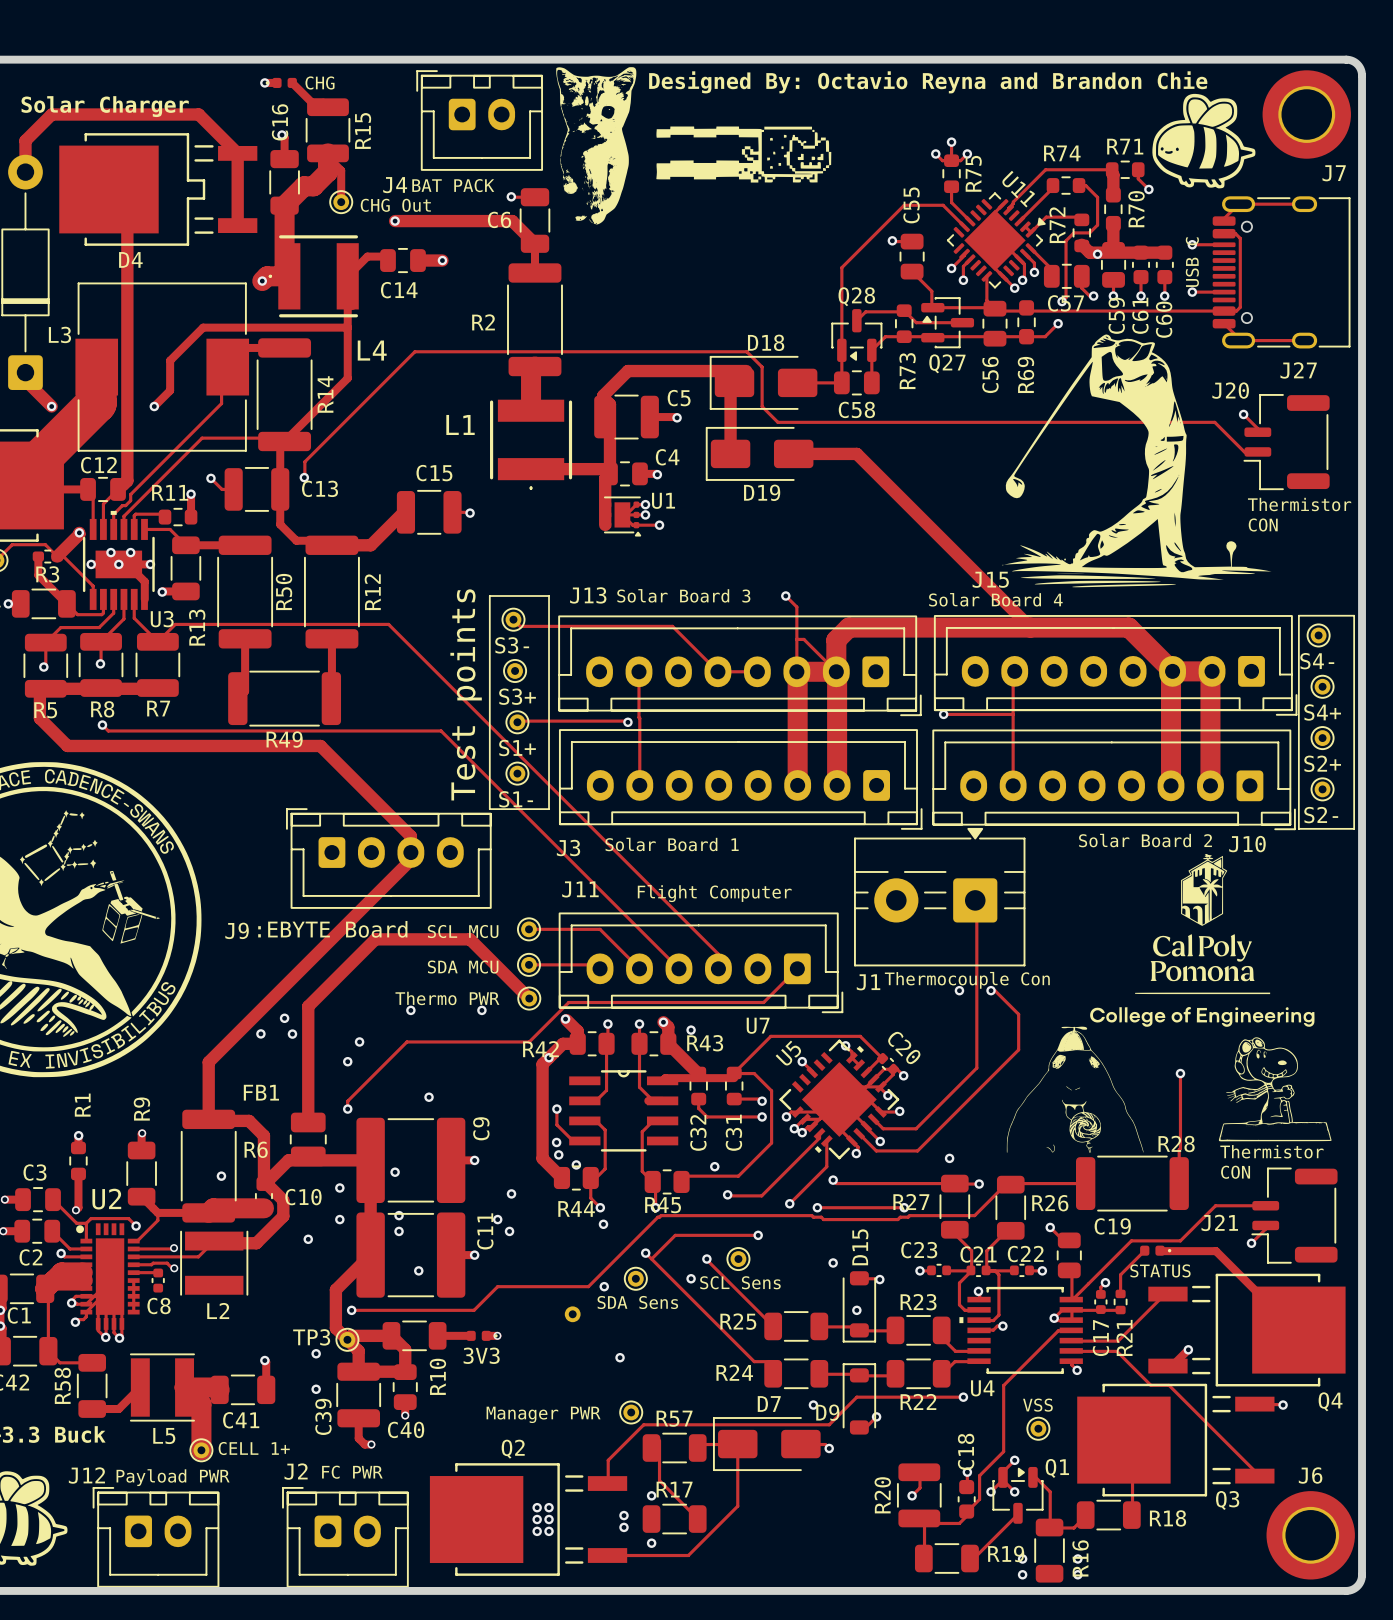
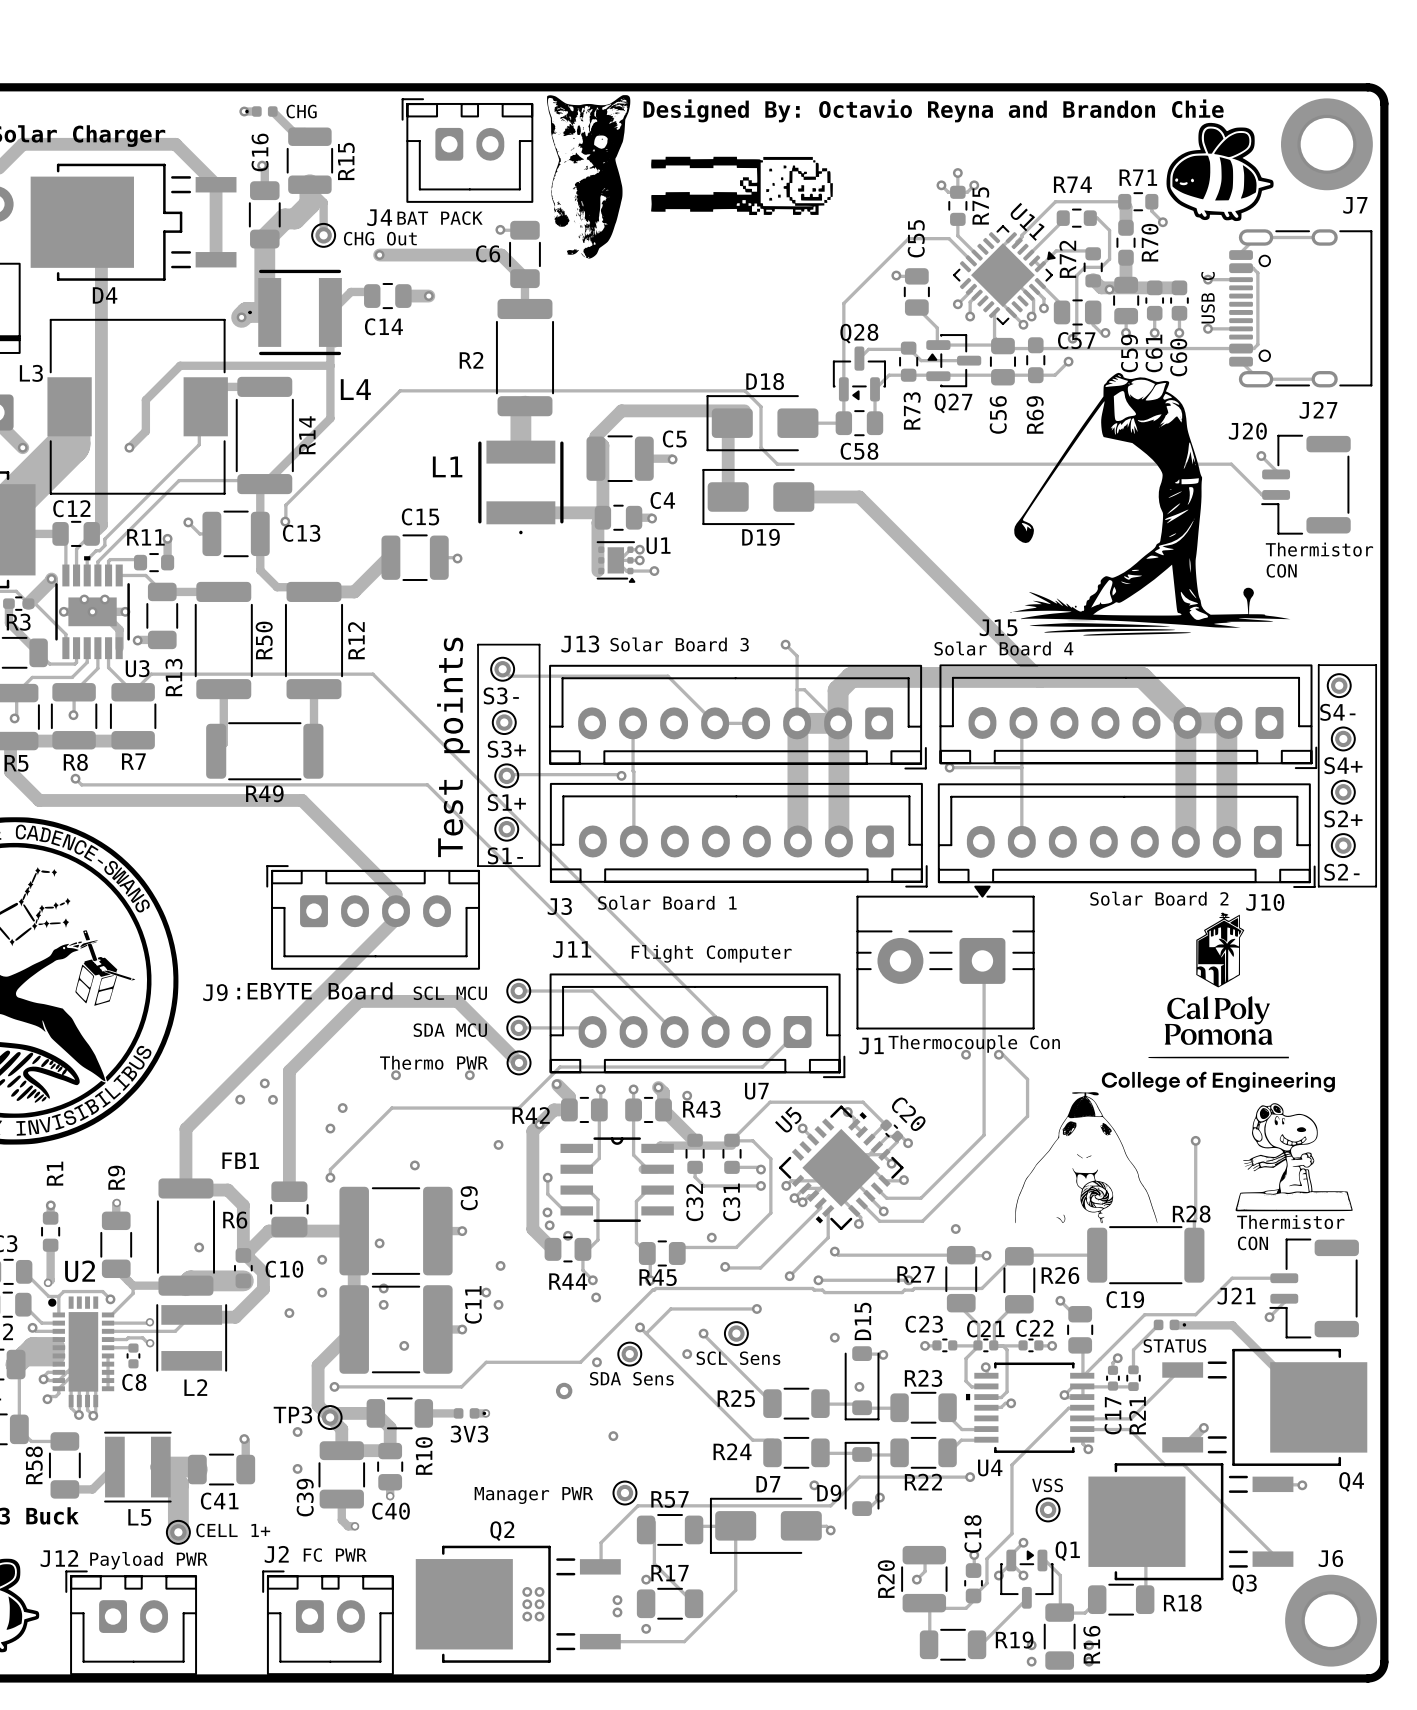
via: none -> (498, 1144)

